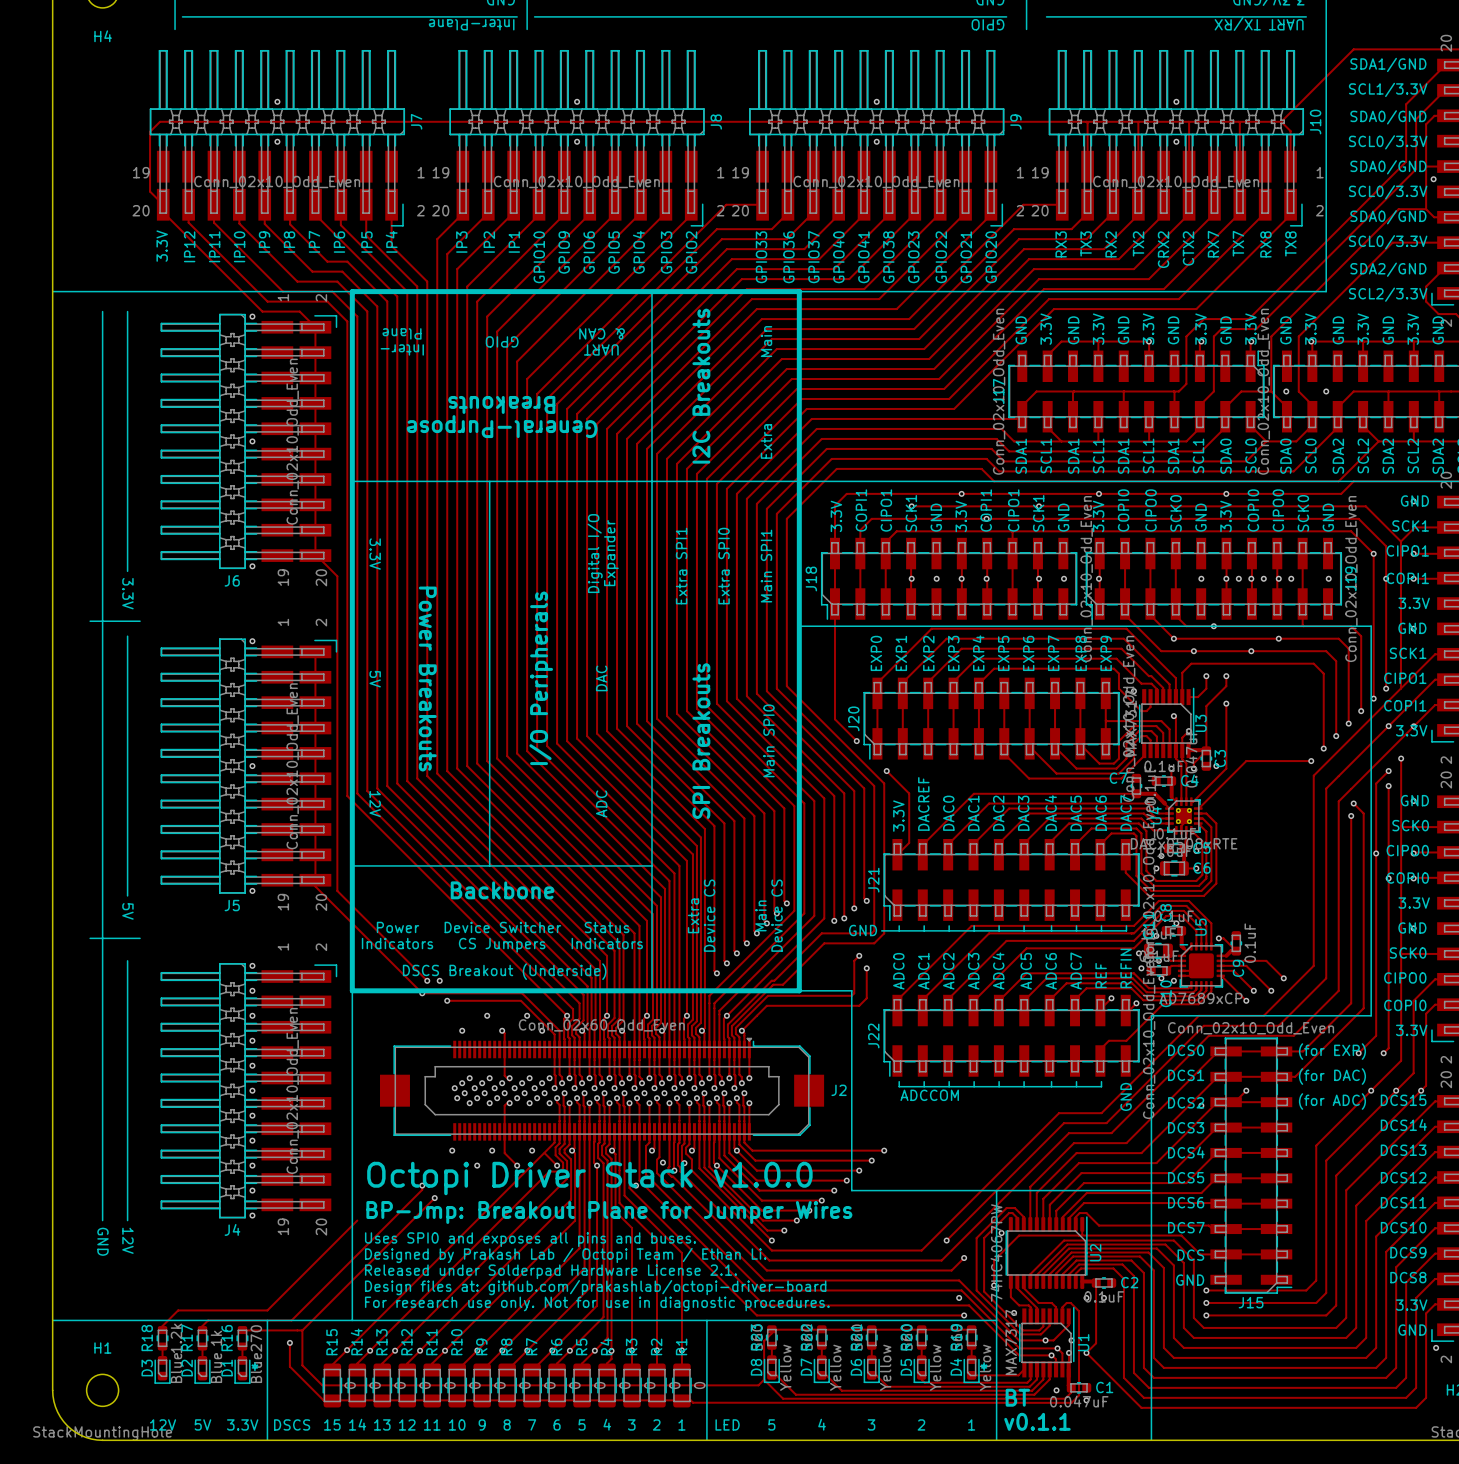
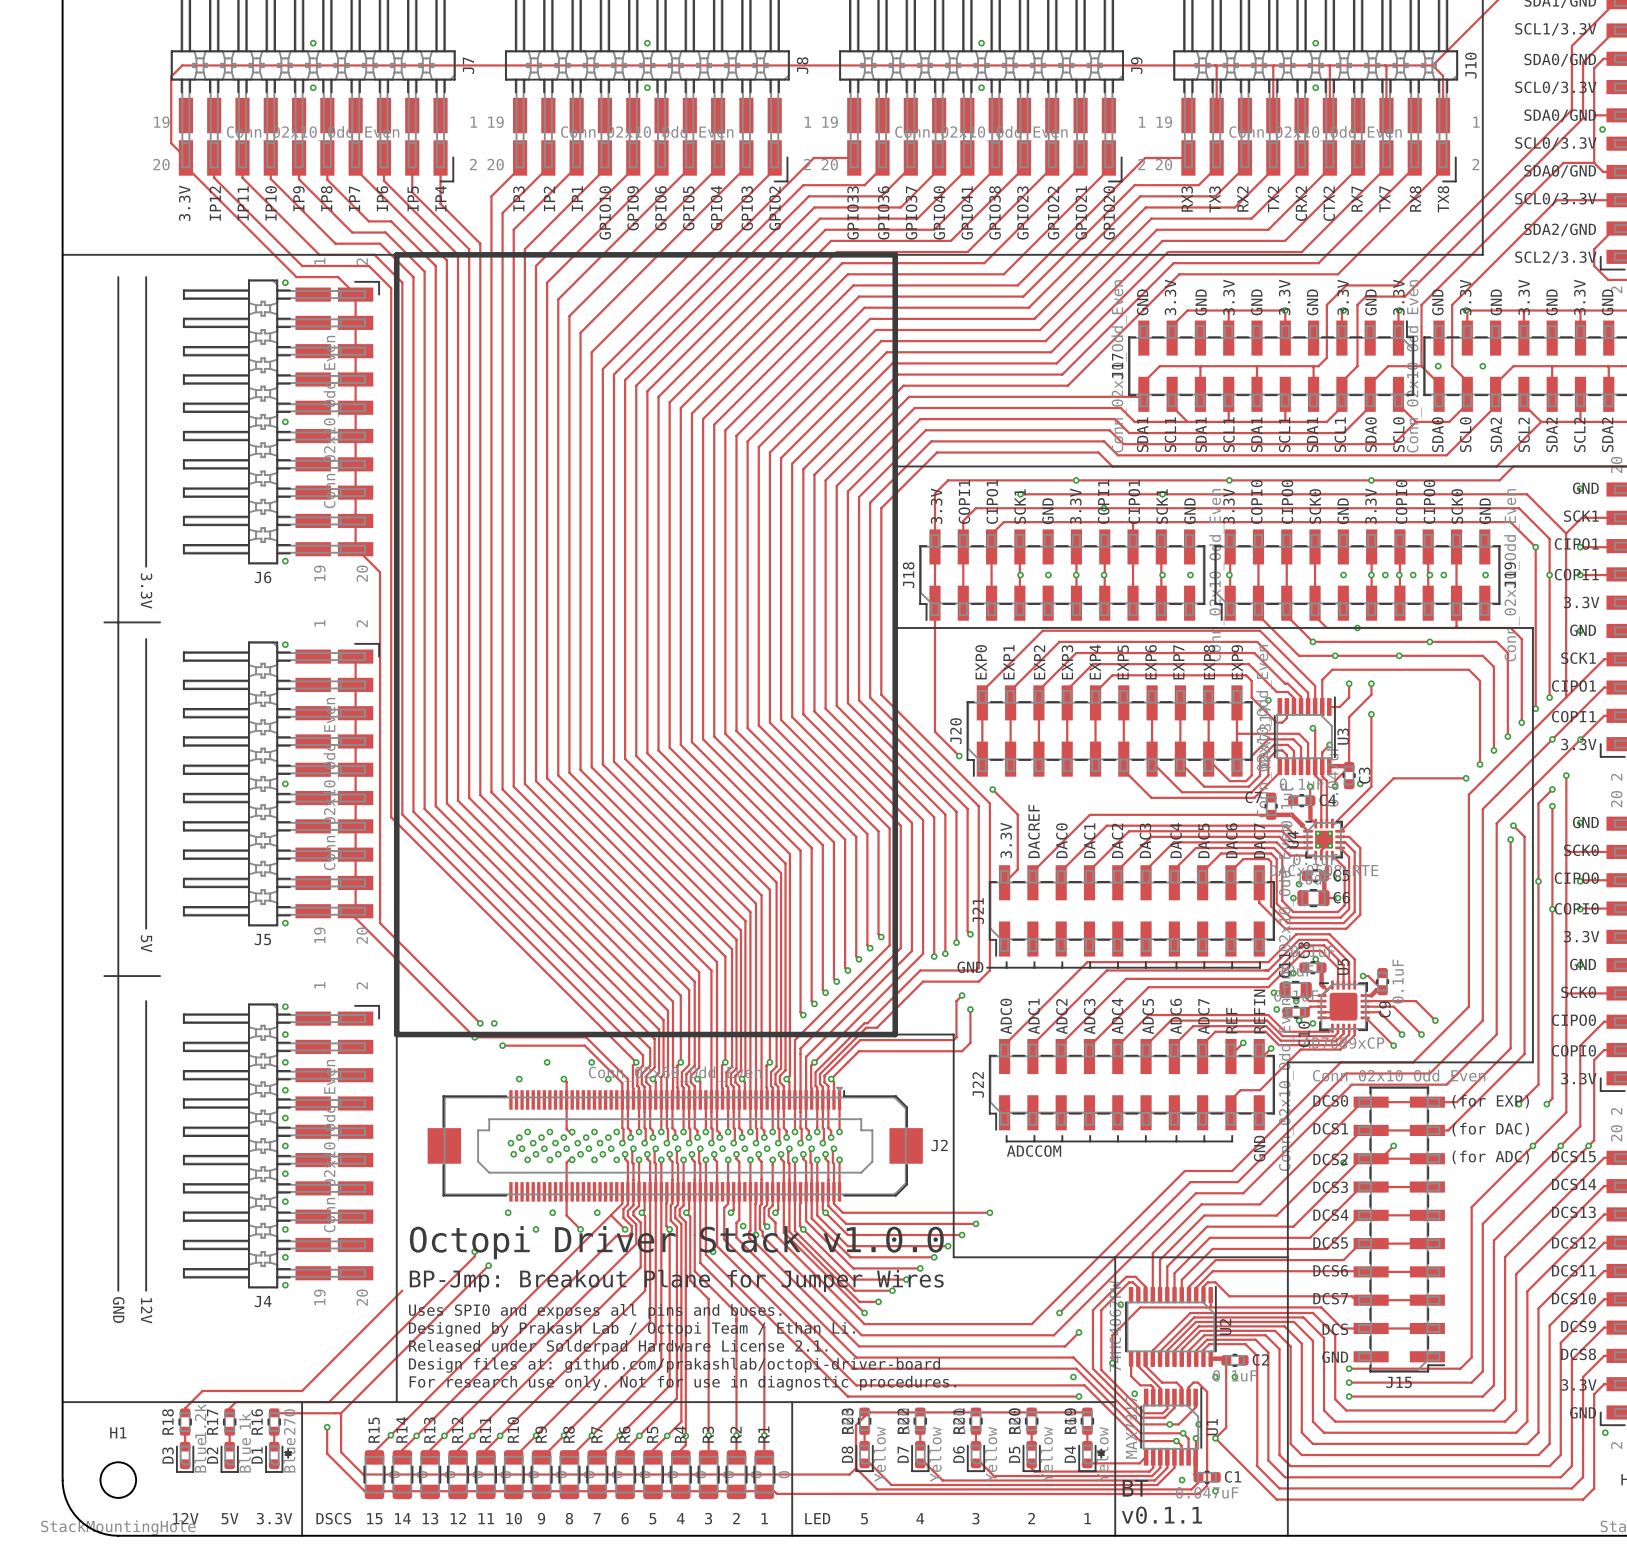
line: (651, 291) (651, 990) -> none
text: Plane (402, 333) -> none
text: & CAN (602, 333) -> none
text: GPIO (502, 341) -> none
text: Main (766, 341) -> none
text: Inter- (402, 349) -> none
text: UART (601, 349) -> none
text: I2C Breakouts (701, 386) -> none
text: Breakouts (501, 404) -> none
text: General-Purpose (502, 426) -> none
text: Extra (766, 441) -> none
line: (352, 481) (799, 481) -> none
line: (489, 481) (489, 865) -> none
text: Digital I/O (595, 553) -> none
text: Expander (611, 553) -> none
text: 3.3V (375, 554) -> none
text: Extra SPI1 (681, 566) -> none
text: Extra SPI0 (724, 566) -> none
text: Main SPI1 (766, 566) -> none
text: I/O Peripherals (541, 678) -> none
text: DAC (601, 678) -> none
text: 5V (375, 679) -> none
text: Power Breakouts (427, 679) -> none
text: Main SPI0 (768, 740) -> none
text: SPI Breakouts (701, 741) -> none
text: 12V (375, 804) -> none
text: ADC (601, 804) -> none
line: (352, 865) (651, 865) -> none
text: Backbone (502, 890) -> none
text: Extra (693, 915) -> none
text: Device CS (709, 915) -> none
text: Main (760, 915) -> none
text: Device CS (777, 915) -> none
text: Power (397, 927) -> none
text: Device Switcher (502, 927) -> none
text: Status (607, 927) -> none
text: Indicators (397, 943) -> none
text: Indicators (607, 943) -> none
text: CS Jumpers (502, 945) -> none
text: DSCS Breakout (Underside) (504, 971) -> none

